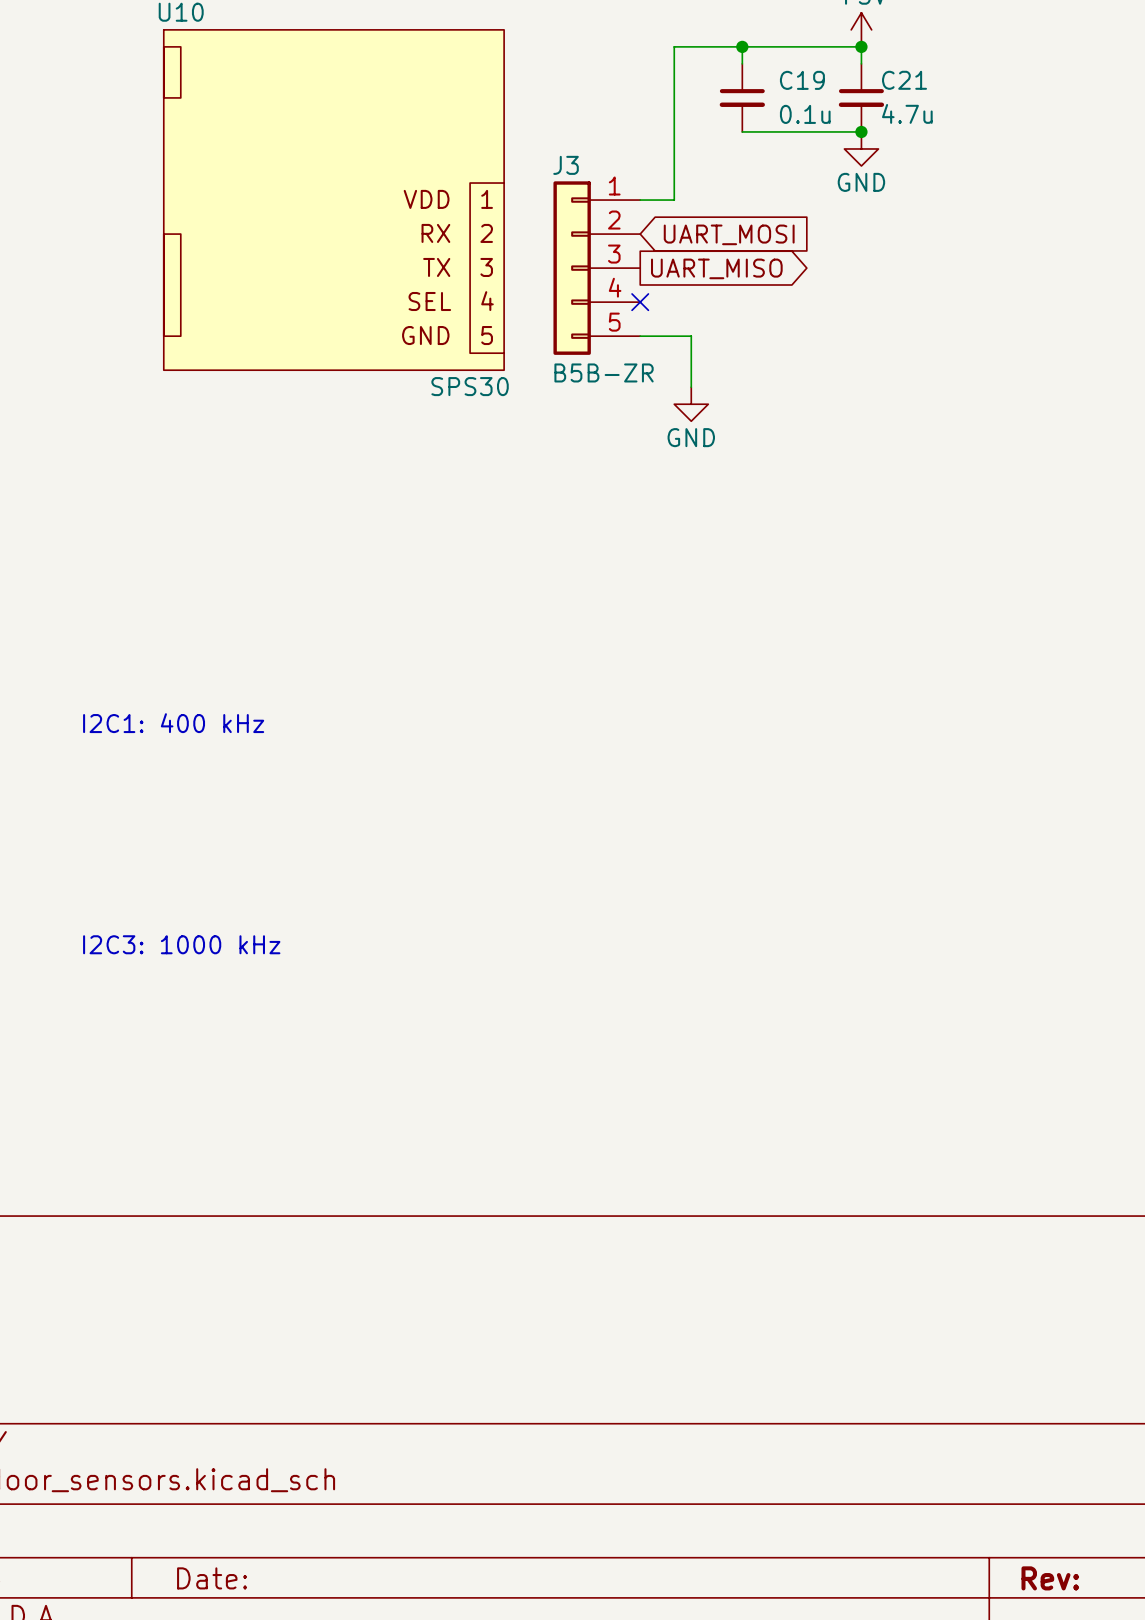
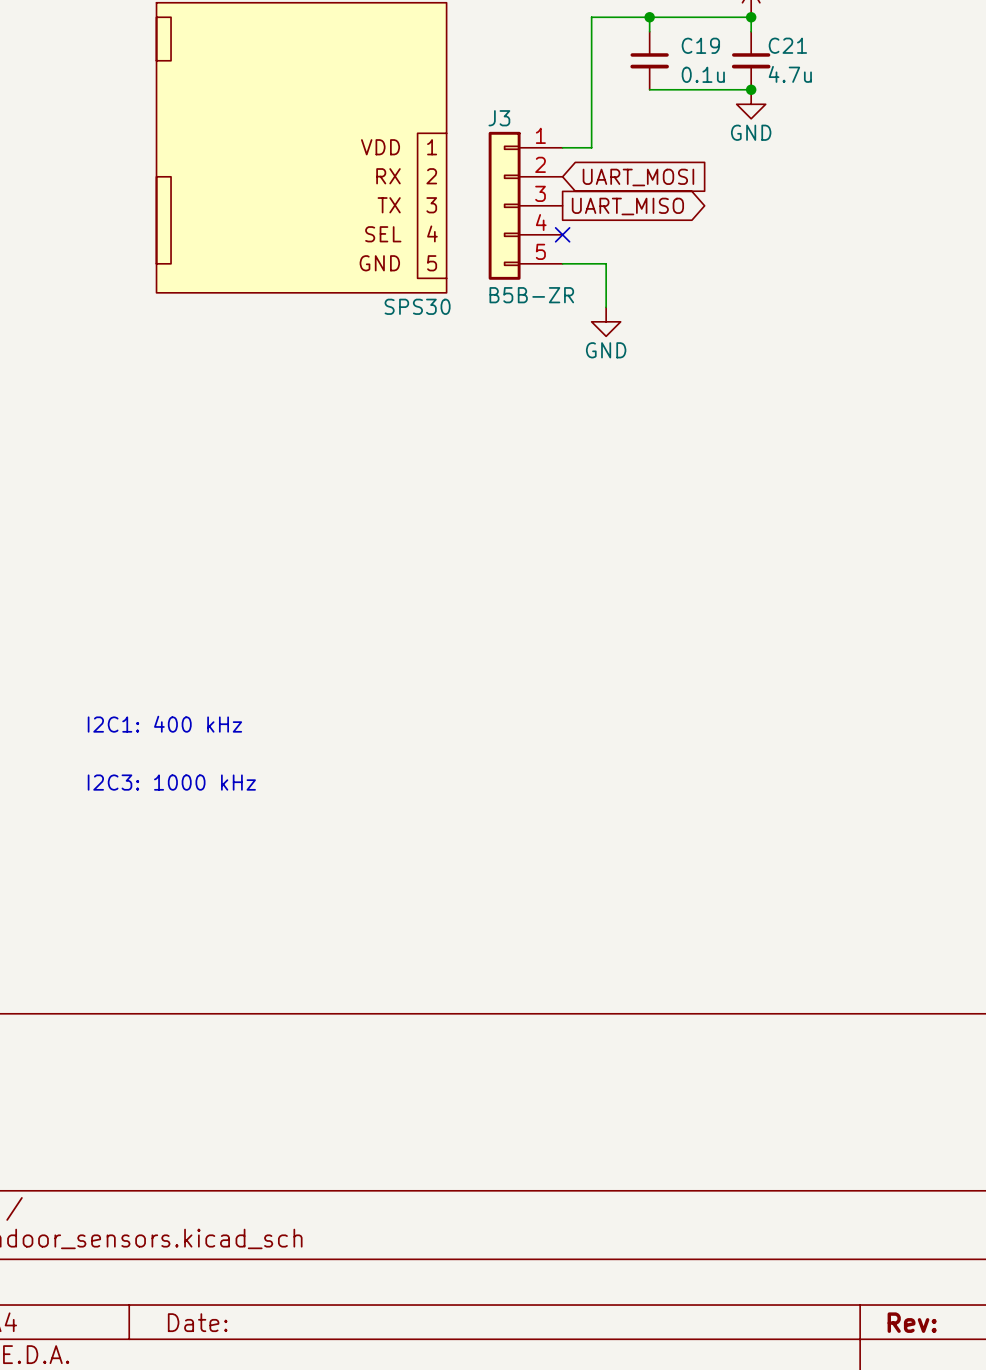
text position: I2C1: 400 kHz (173, 723) -> I2C1: 400 kHz (164, 724)

